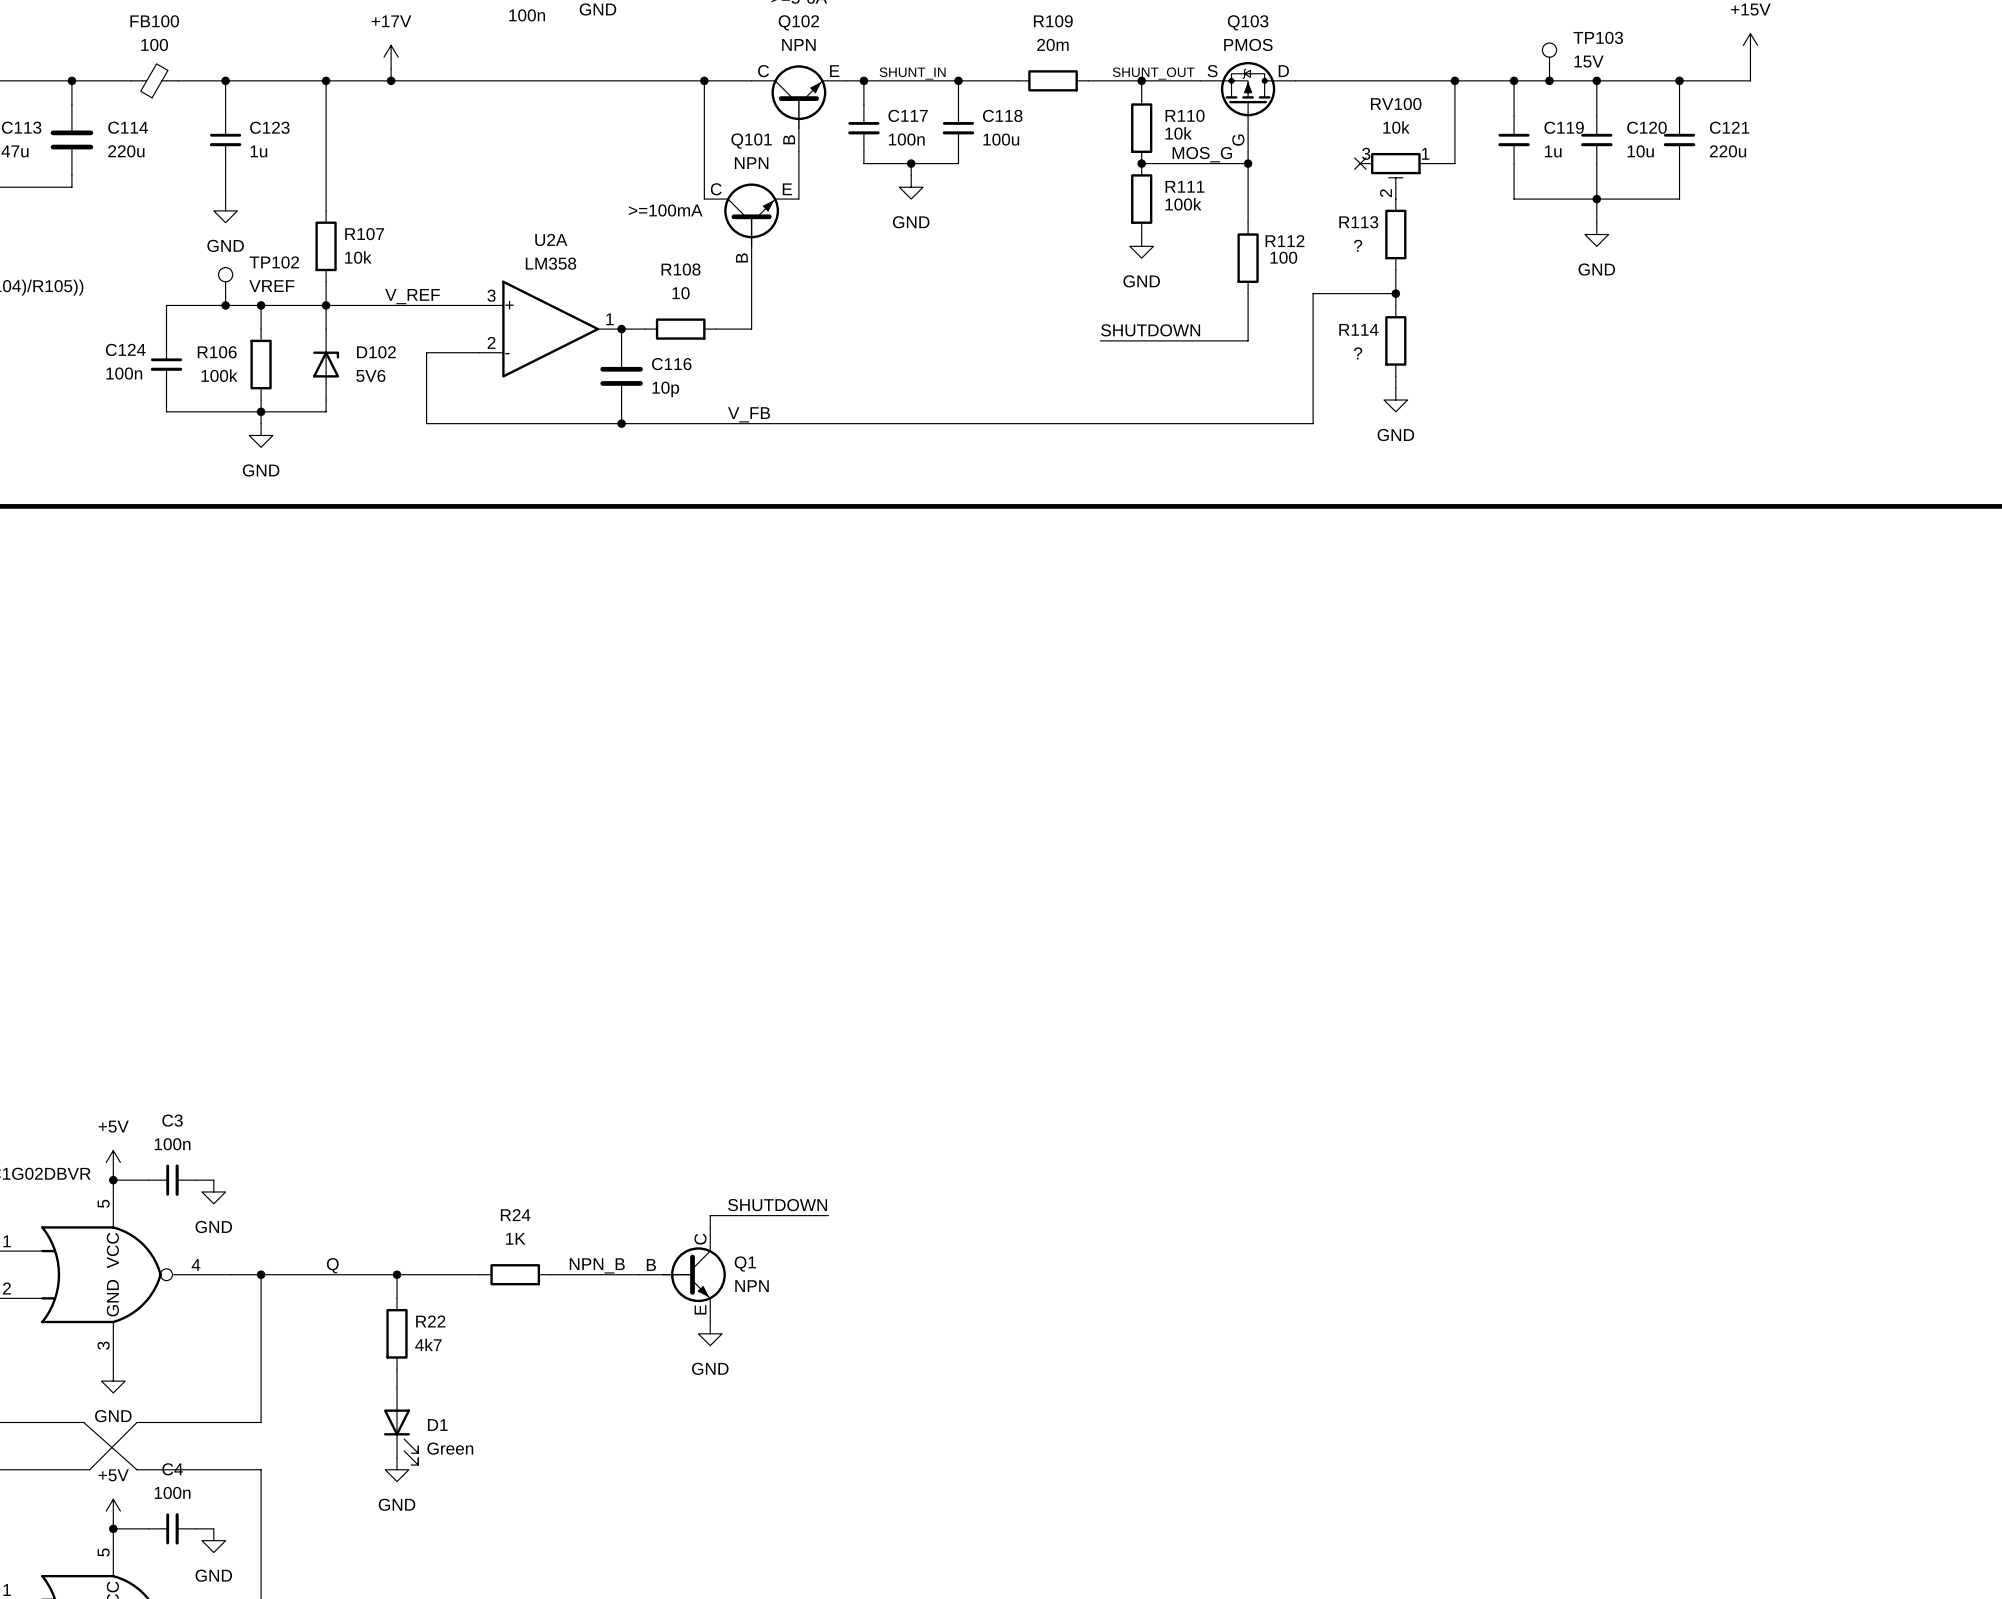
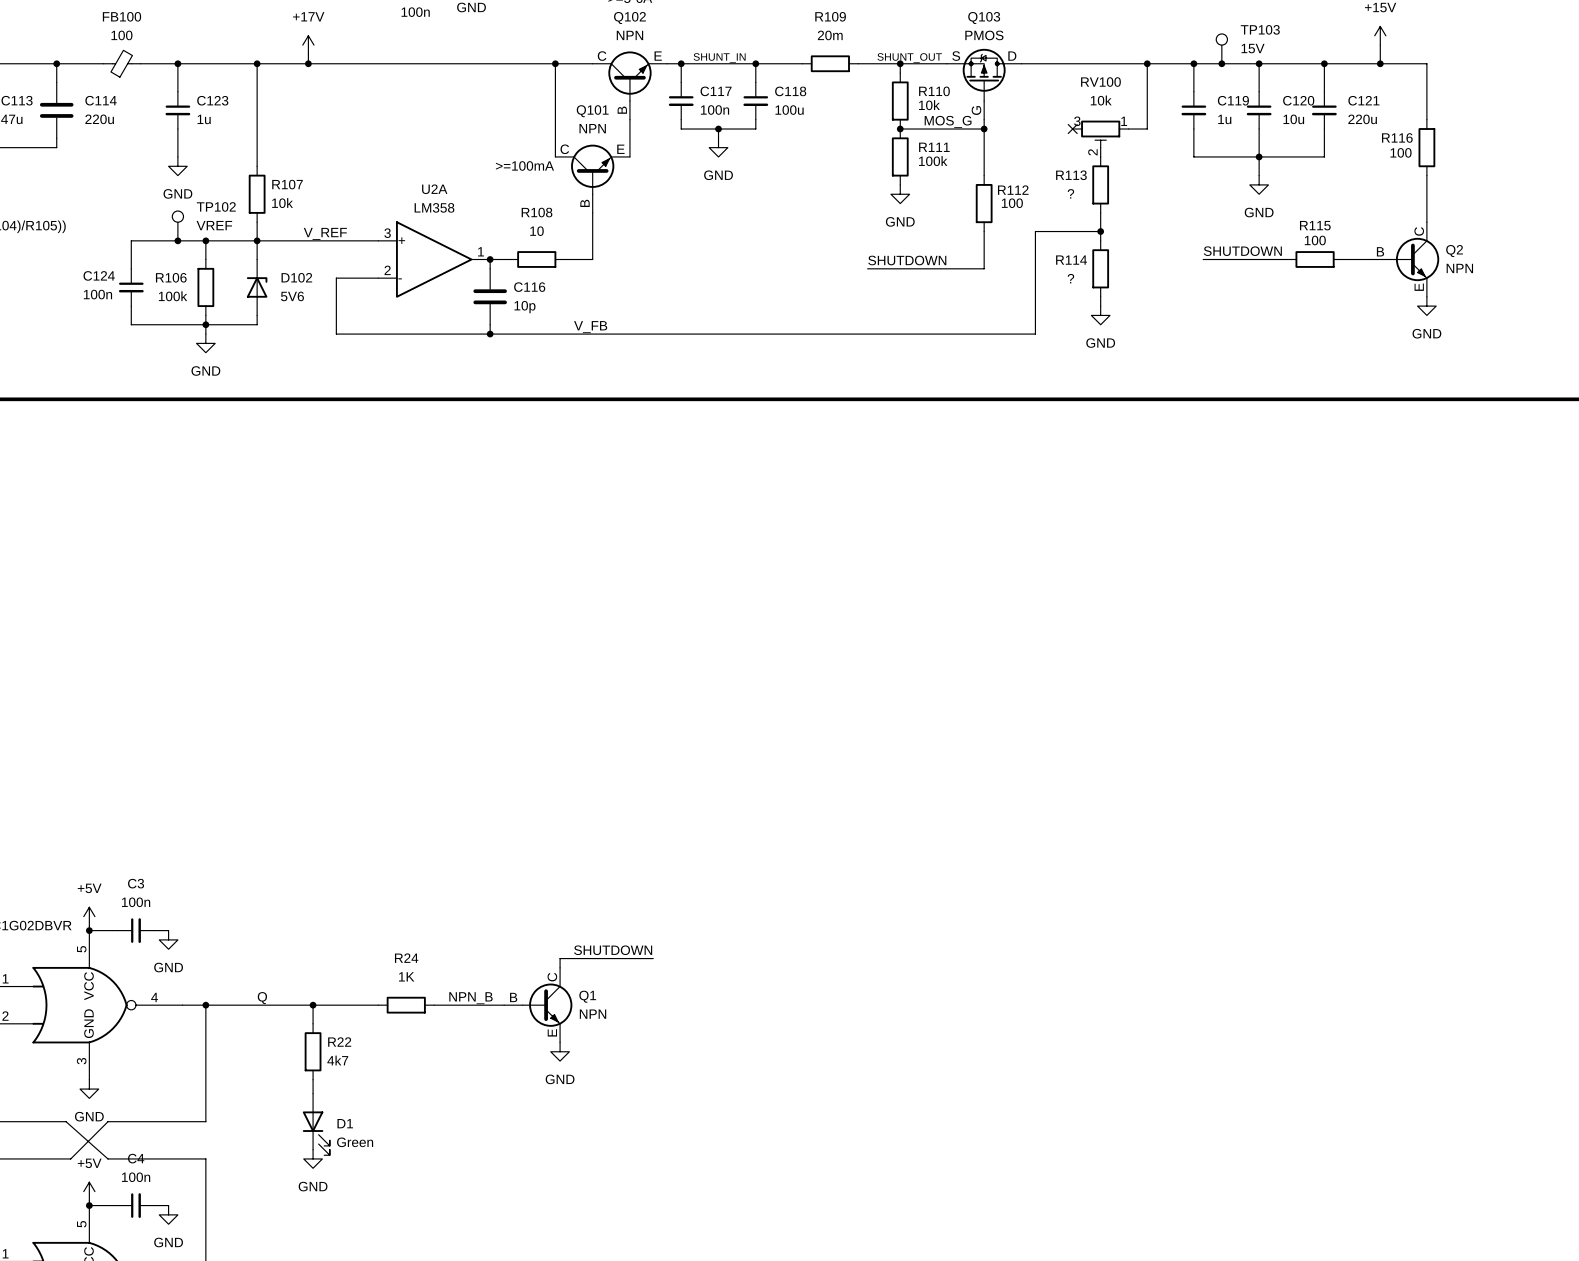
wire: none -> (1380, 63) (1426, 63) (1426, 119)
junction: none -> (1380, 63)
R116: none -> 100 (1426, 147)
wire: none -> (1426, 175) (1426, 222)
label: none -> SHUTDOWN (1242, 251)
wire: none -> (1203, 259) (1287, 259)
R115: none -> 100 (1315, 259)
wire: none -> (1343, 259) (1370, 259)
Q2: none -> NPN (1405, 259)
power symbol: none -> GND (1426, 306)

